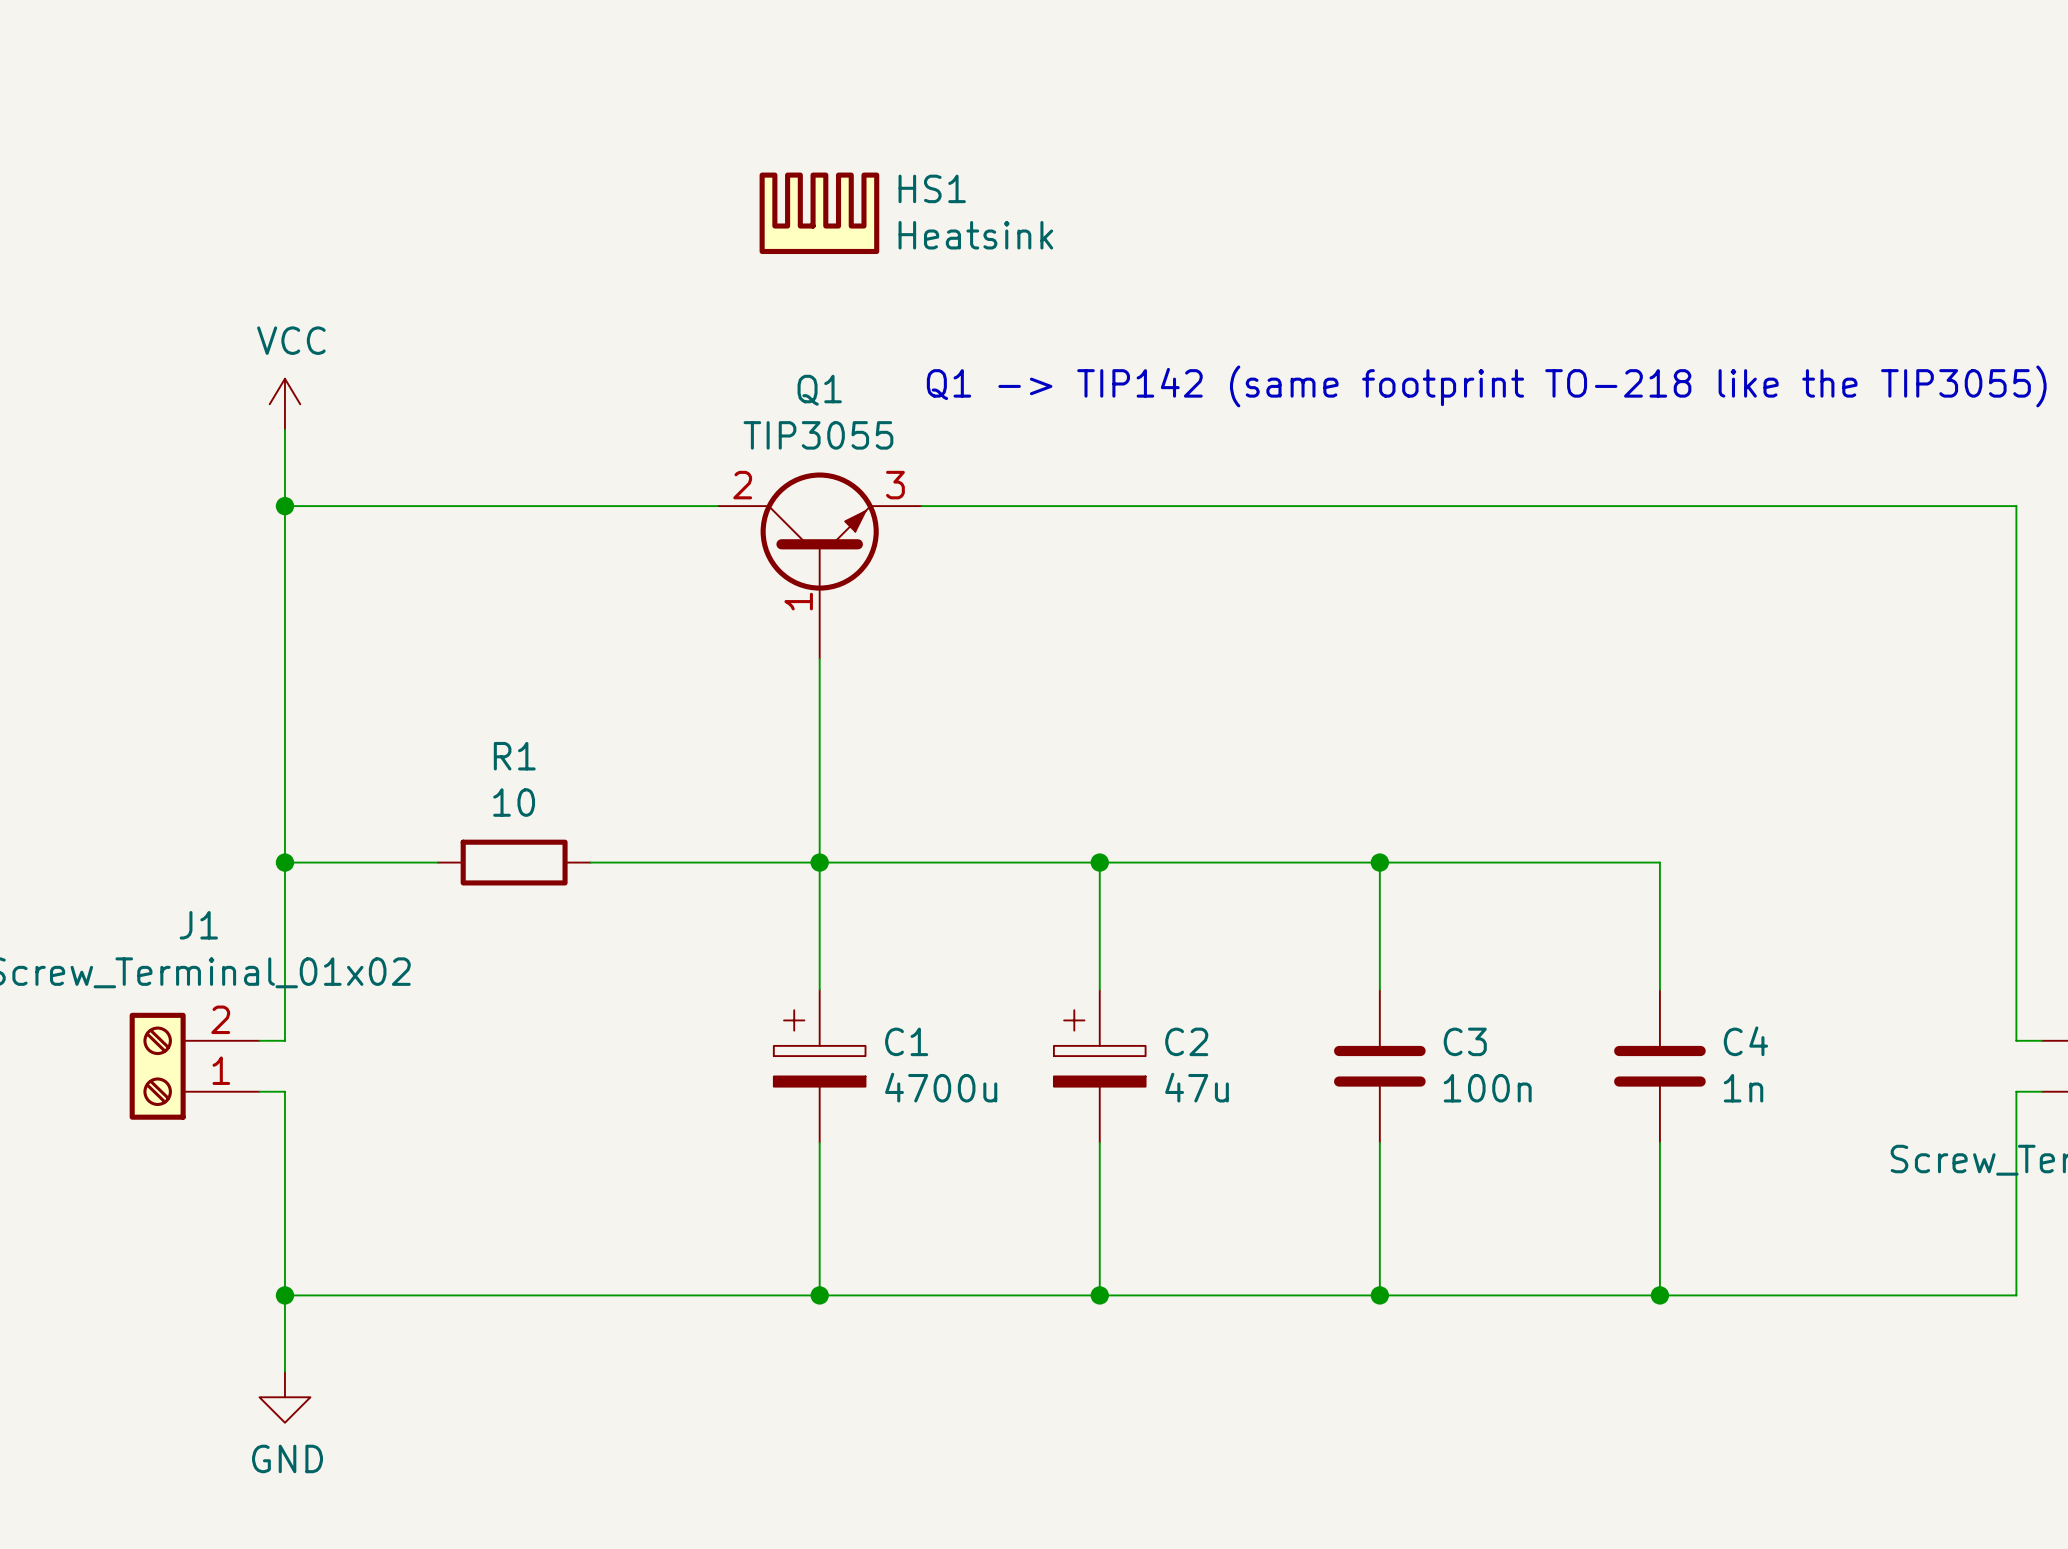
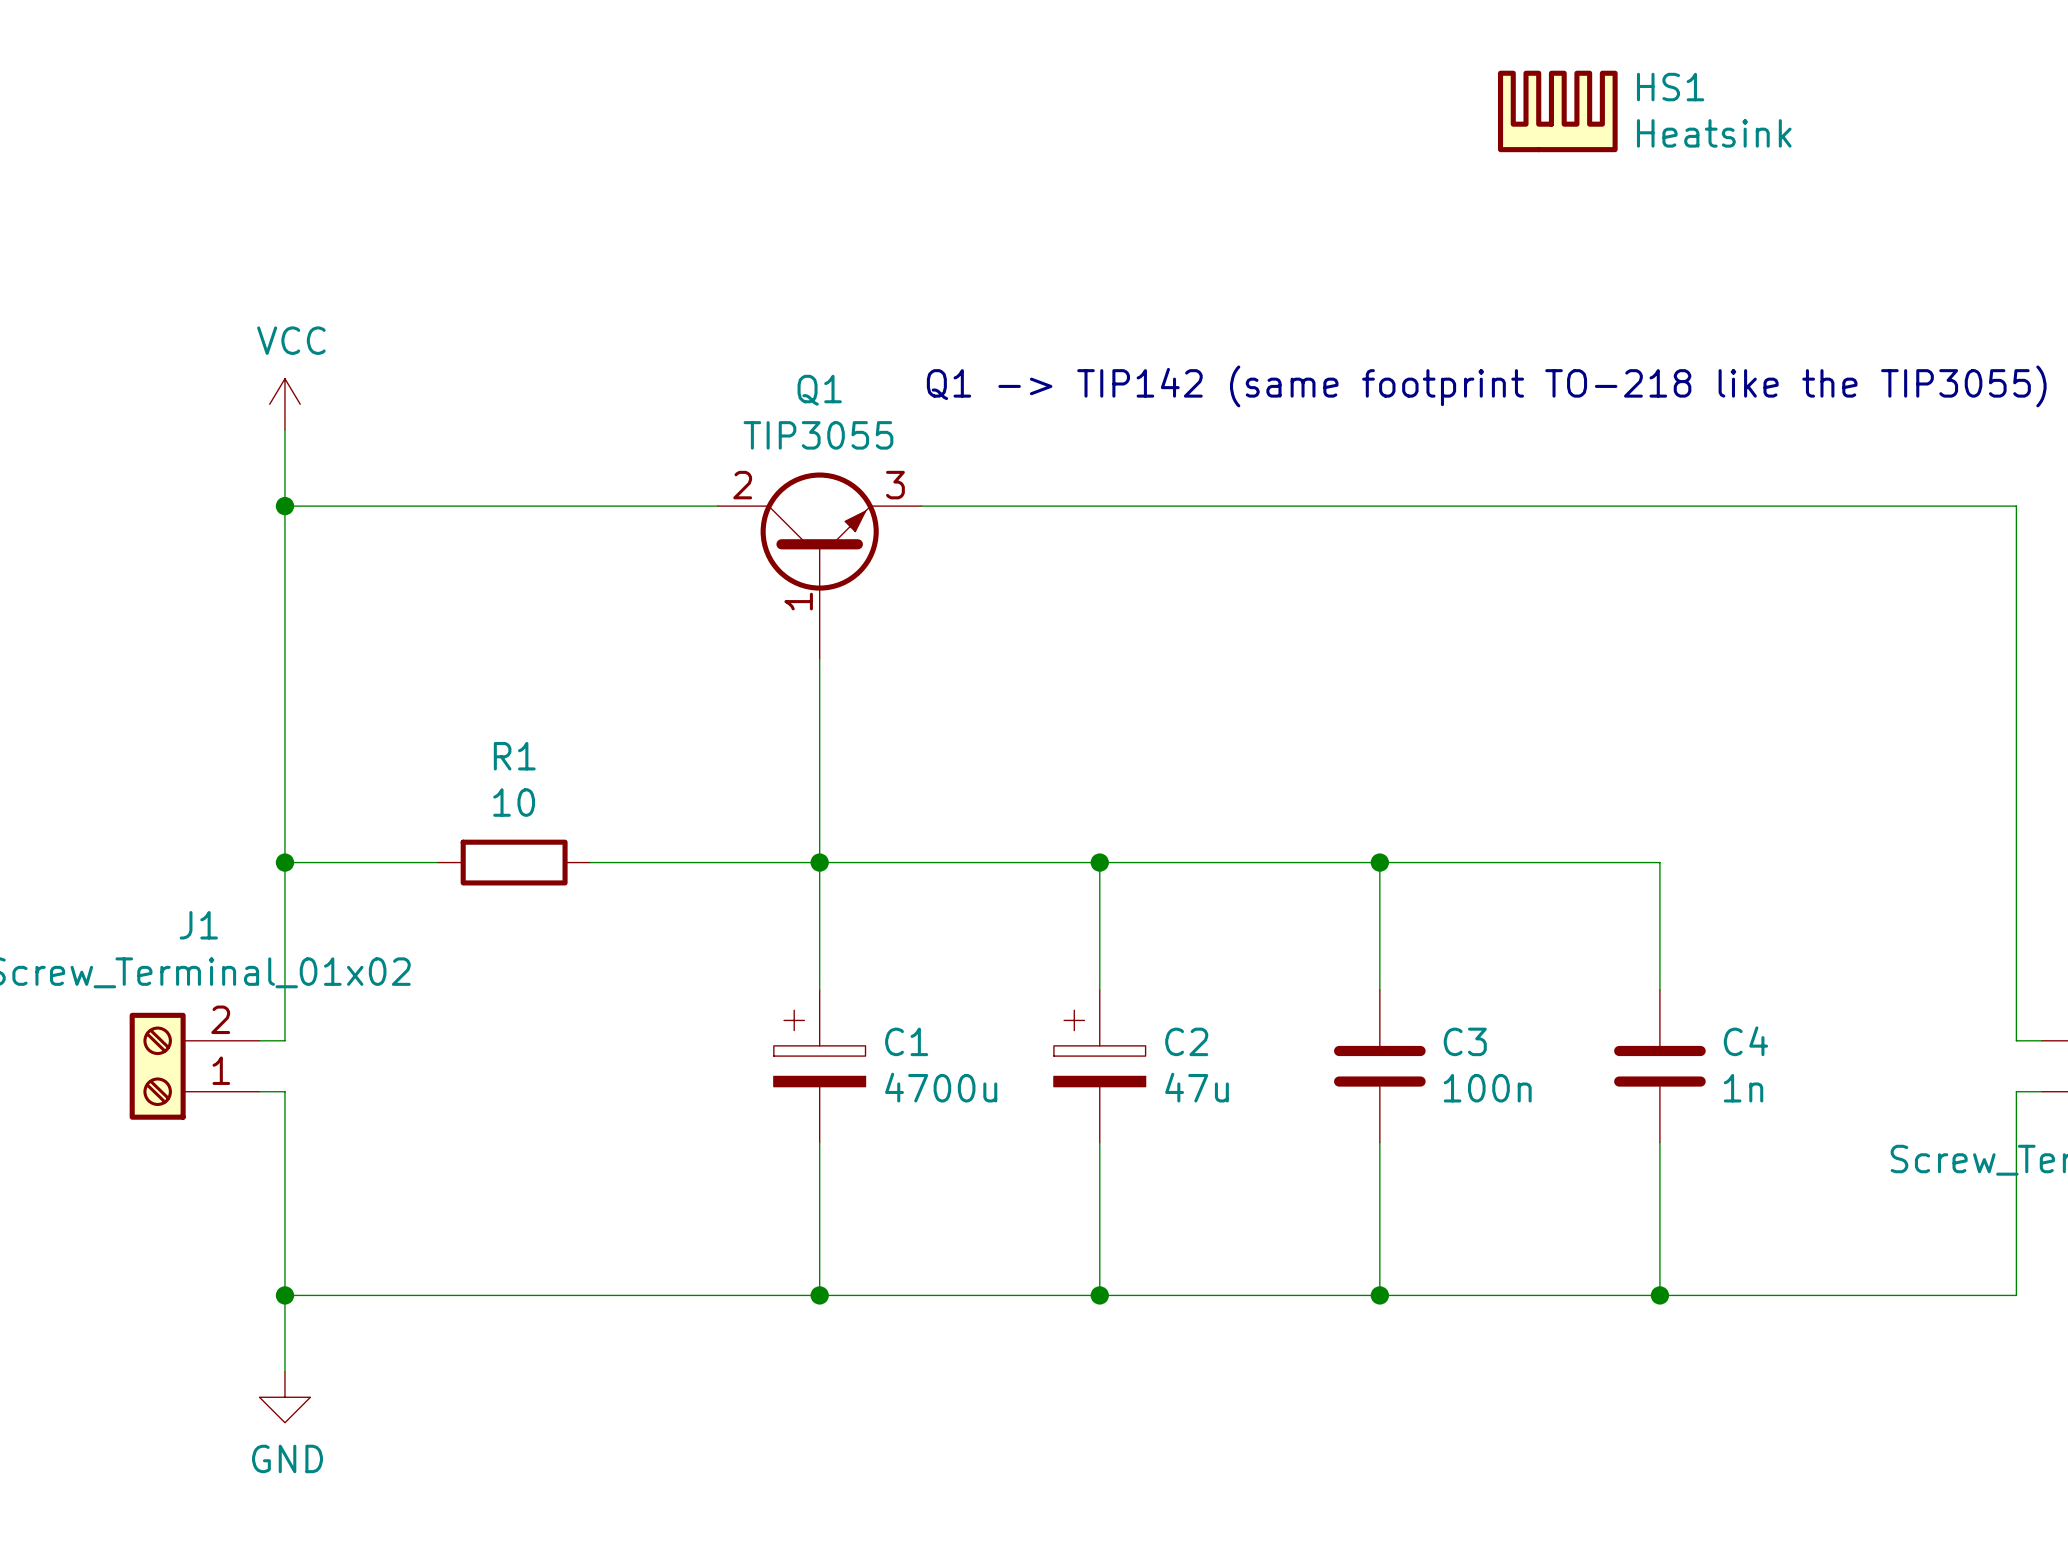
HS1 position: (819, 213) -> (1557, 111)

